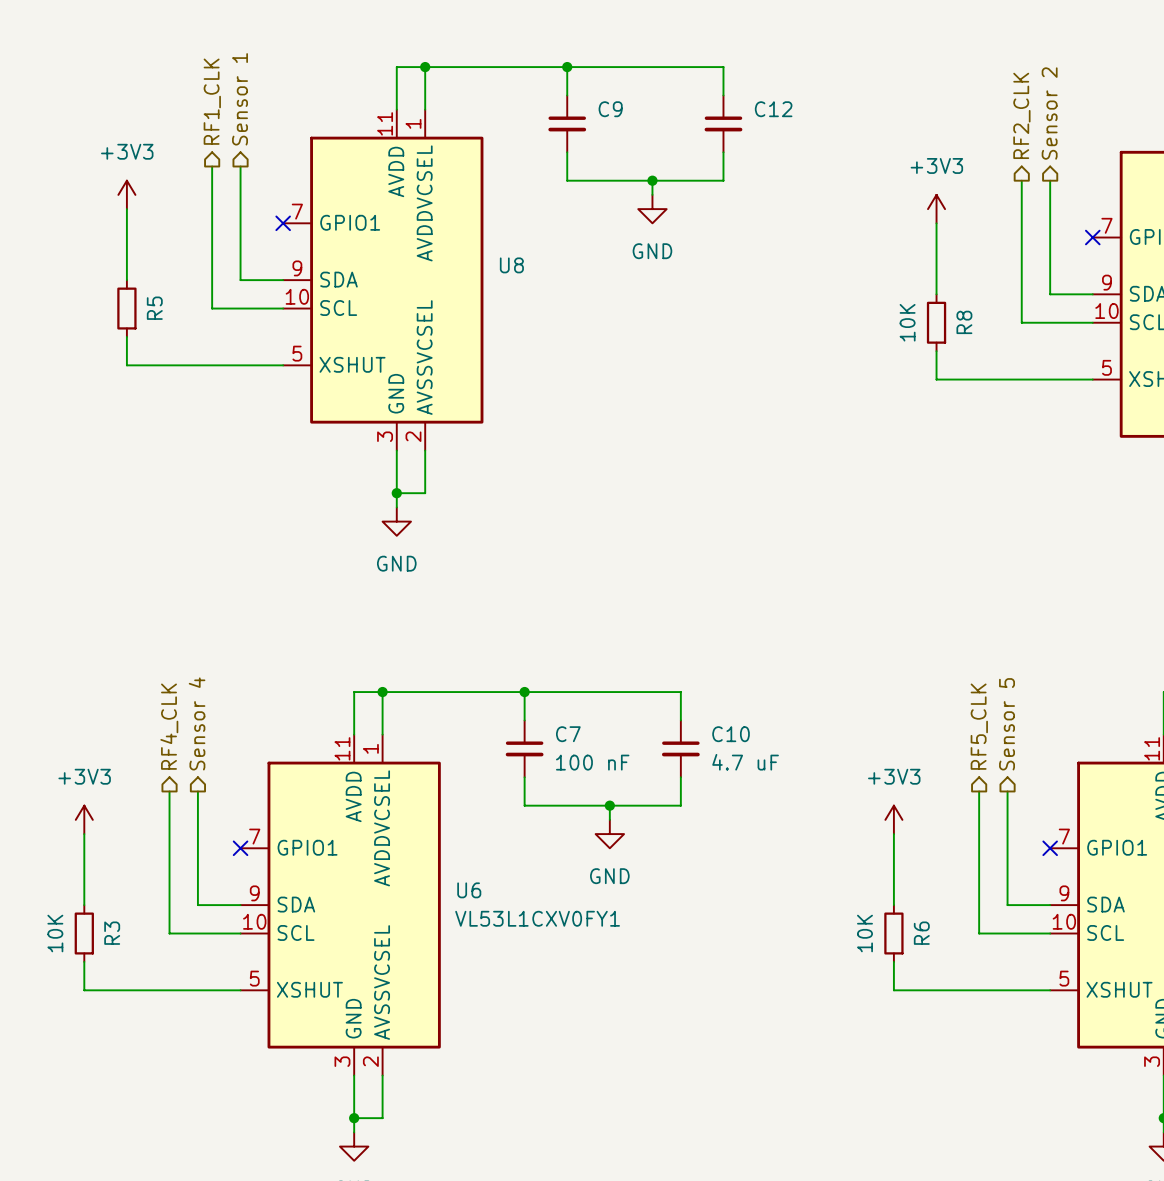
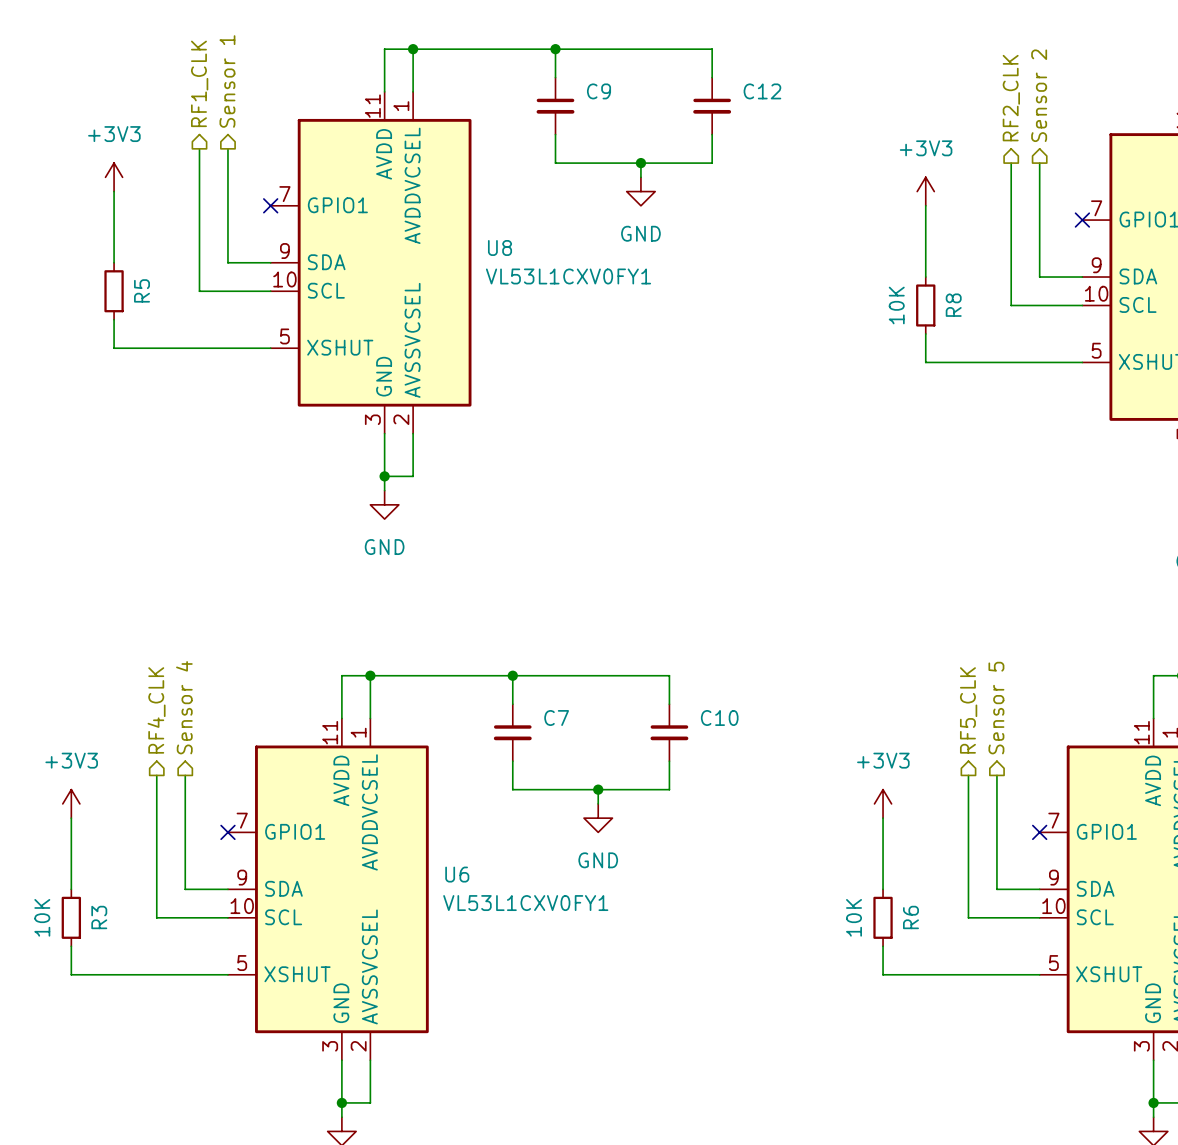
U8 value: none -> VL53L1CXV0FY1 (568, 276)
C7 value: 100 nF (592, 762) -> none
C10 value: 4.7 uF (745, 762) -> none

